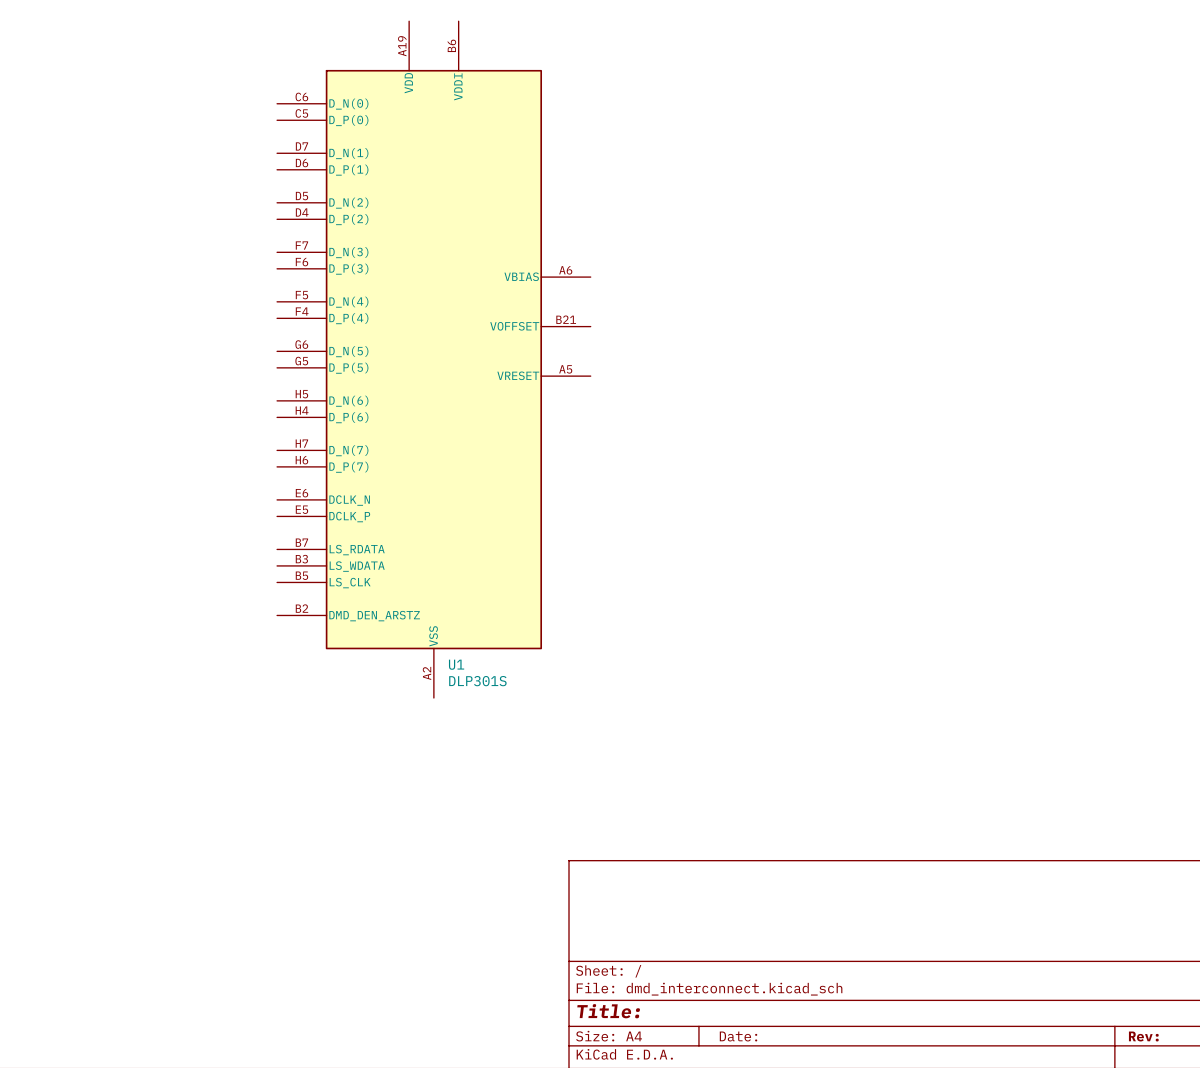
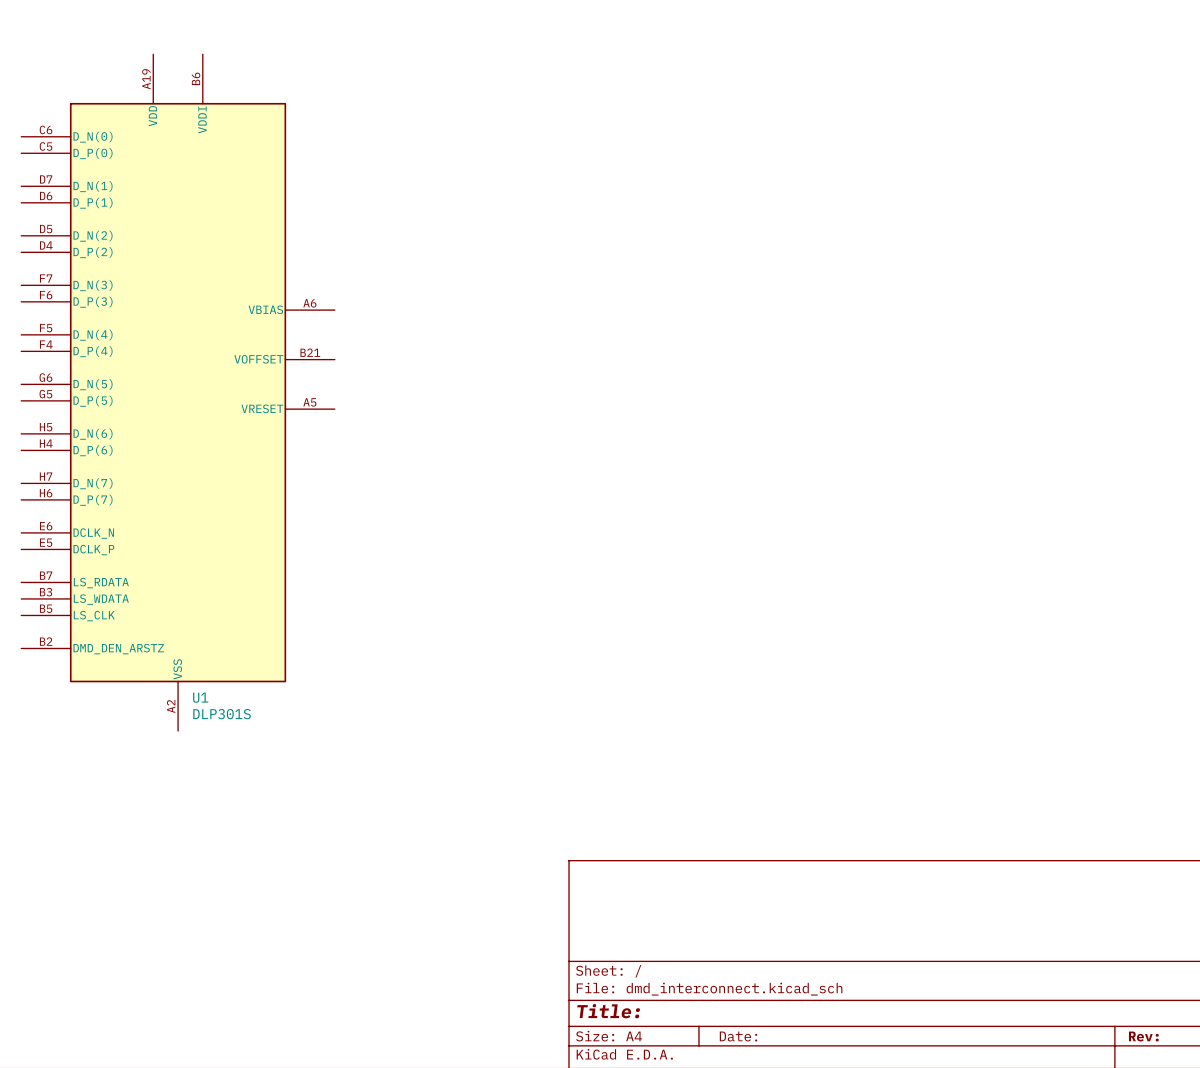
U1 position: (433, 359) -> (178, 392)

